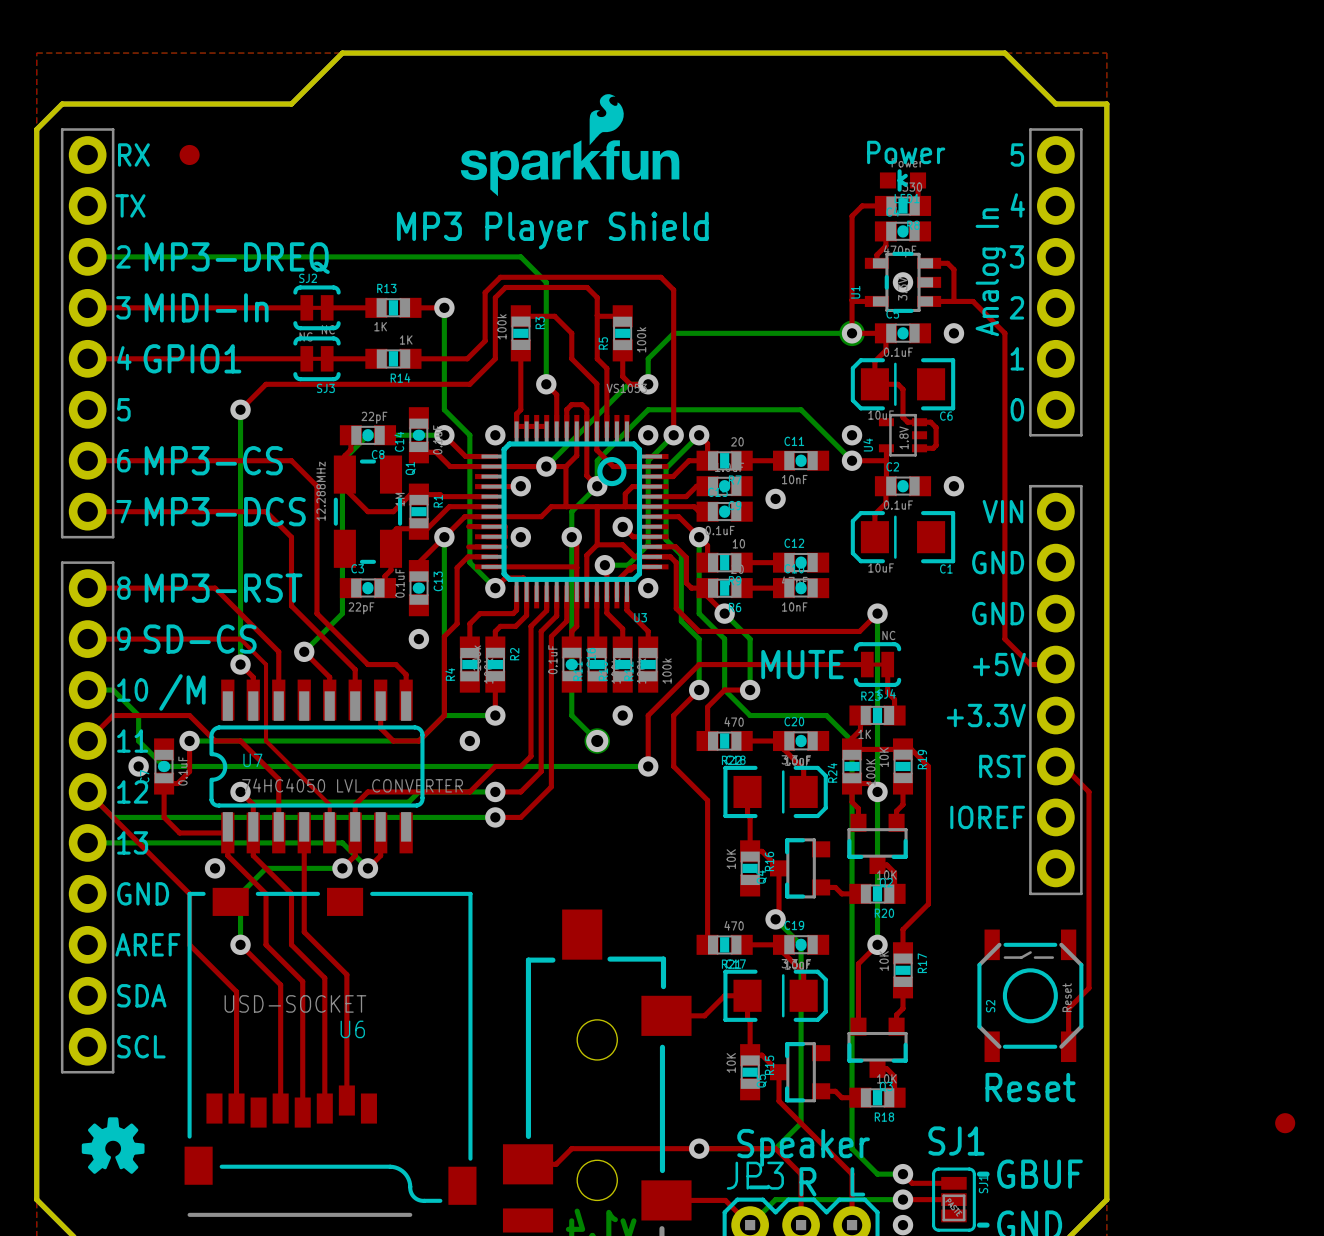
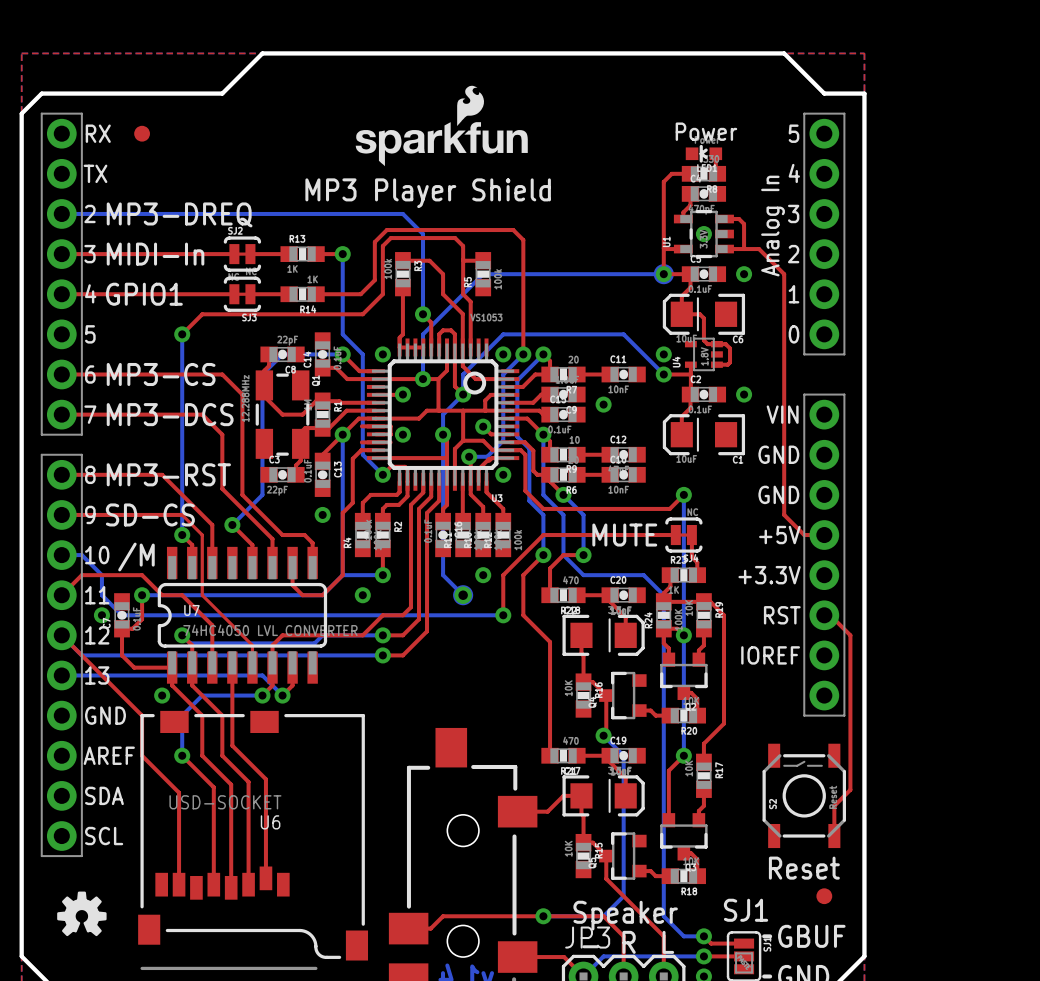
bottom track: (673, 333) (648, 358) (648, 384) (628, 384) (546, 466) -> (523, 274) (483, 274) (423, 334) (423, 379)
top track: (622, 350) (622, 376) (630, 384) (648, 384) -> none
via: (648, 384) -> none
part position: (1285, 1123) -> (824, 896)

